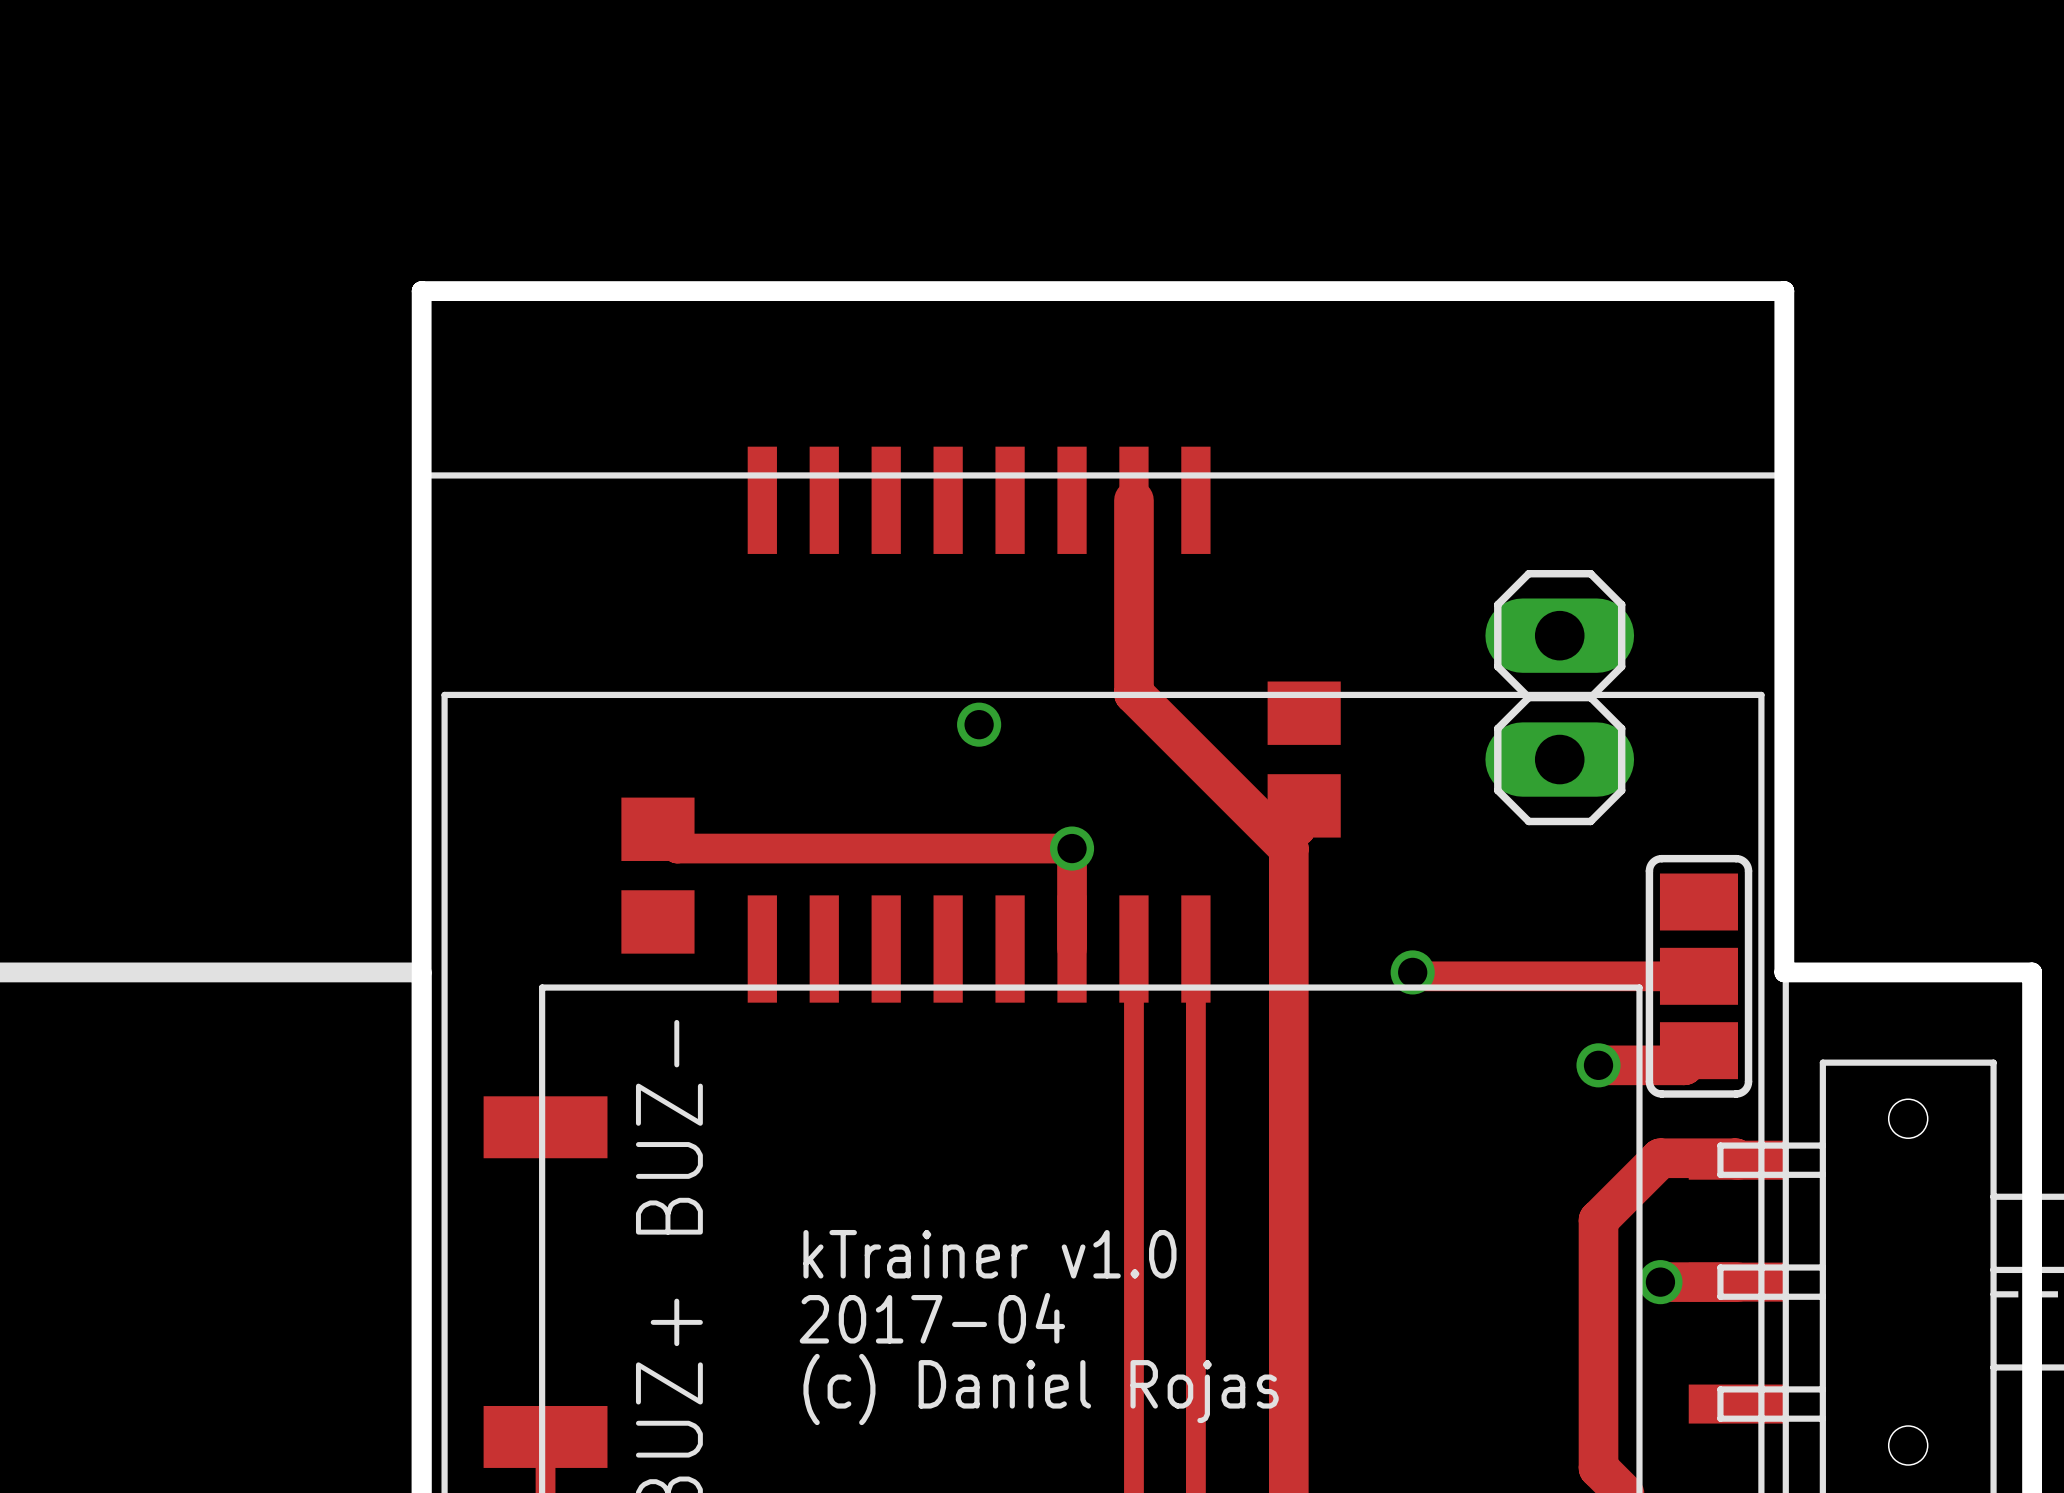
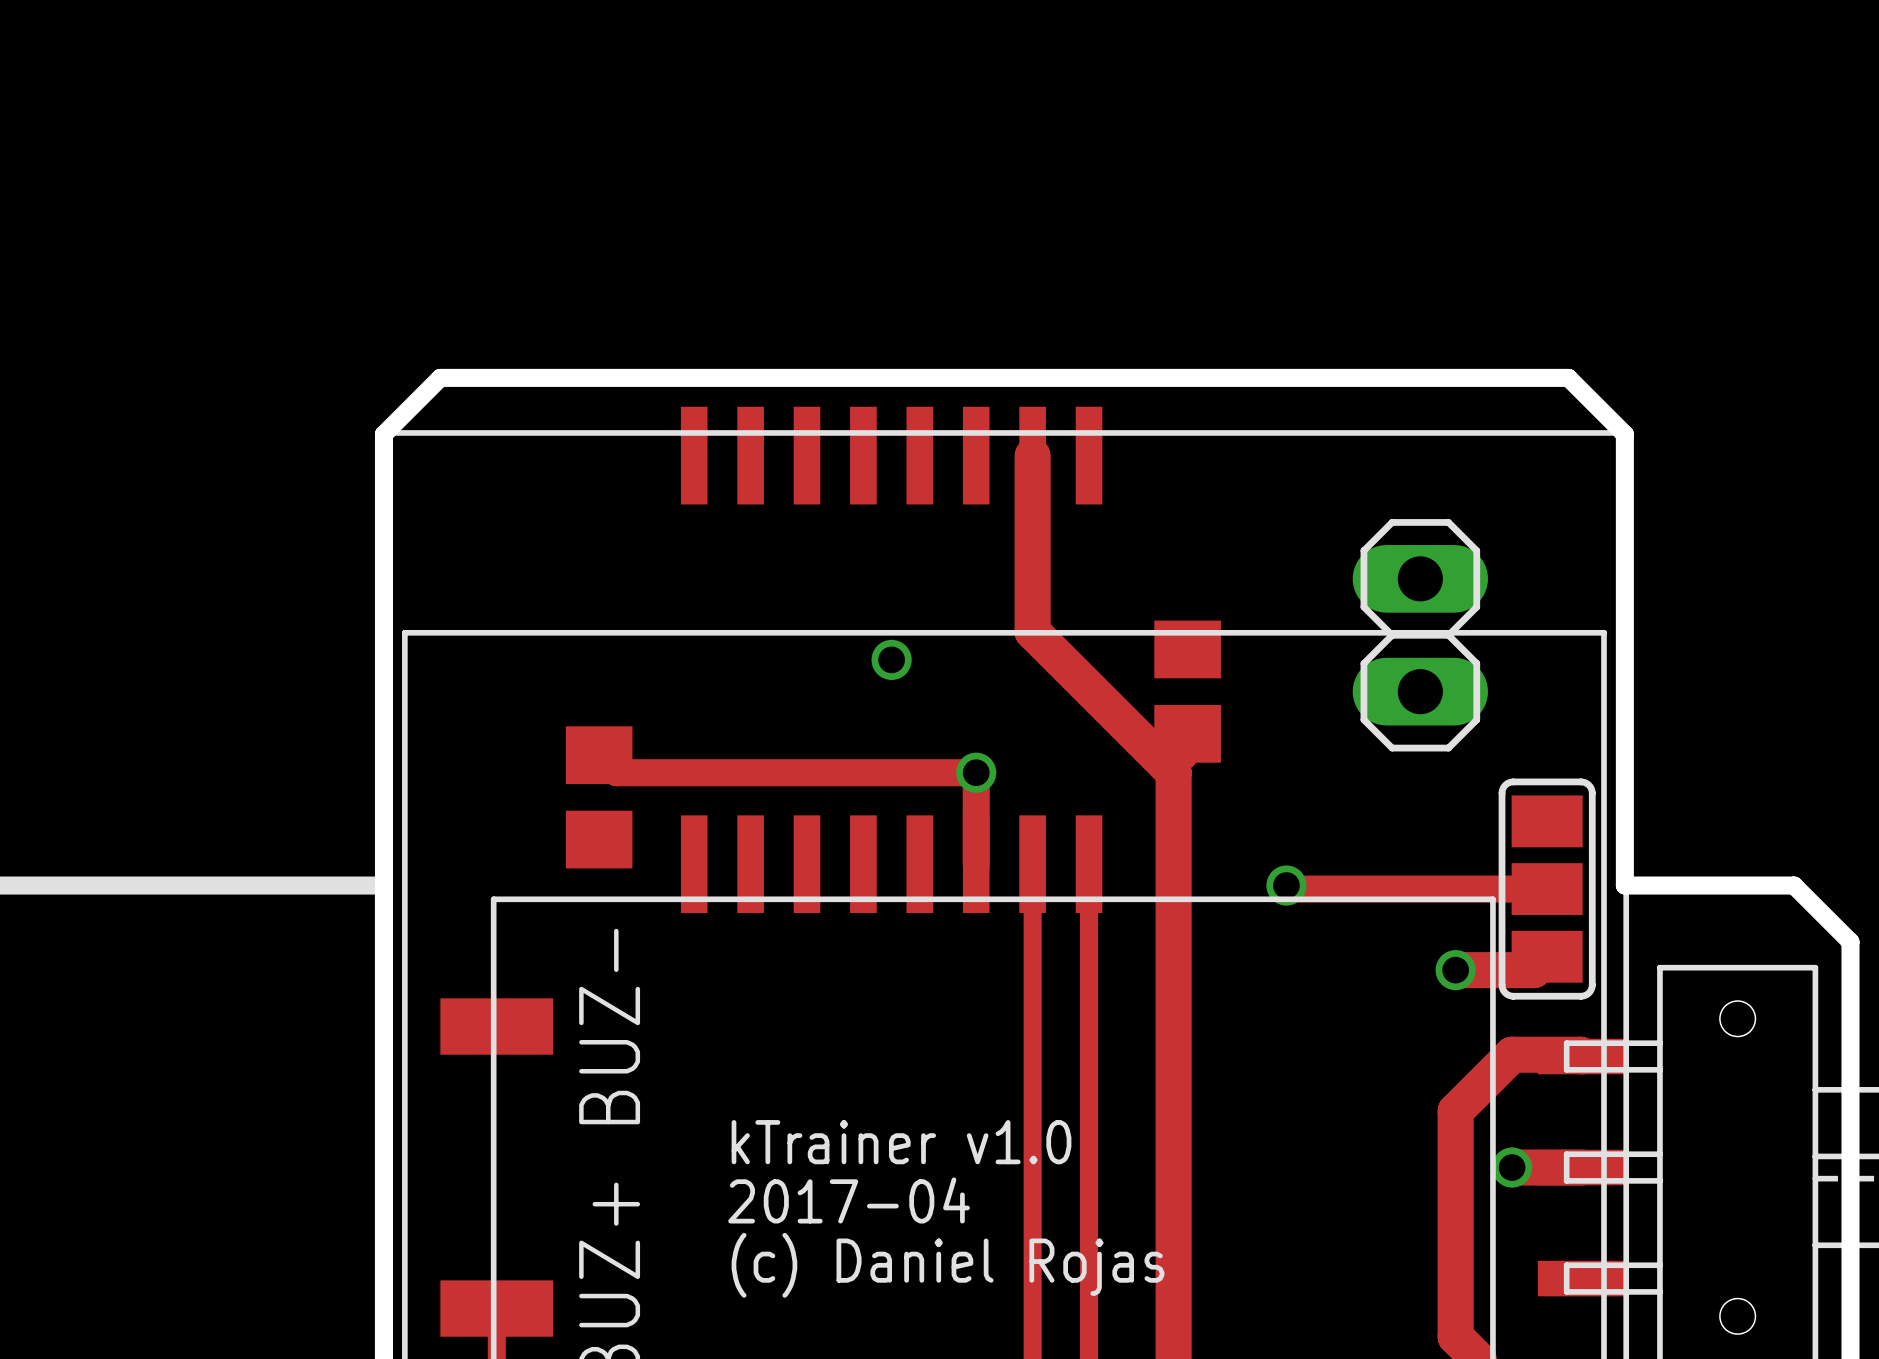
board edge: (421, 476) (421, 291) (1784, 291) (1784, 476) -> (383, 434) (440, 377) (1568, 377) (1624, 434)
board edge: (1970, 972) (2032, 972) (2032, 1034) -> (1794, 885) (1850, 941)

